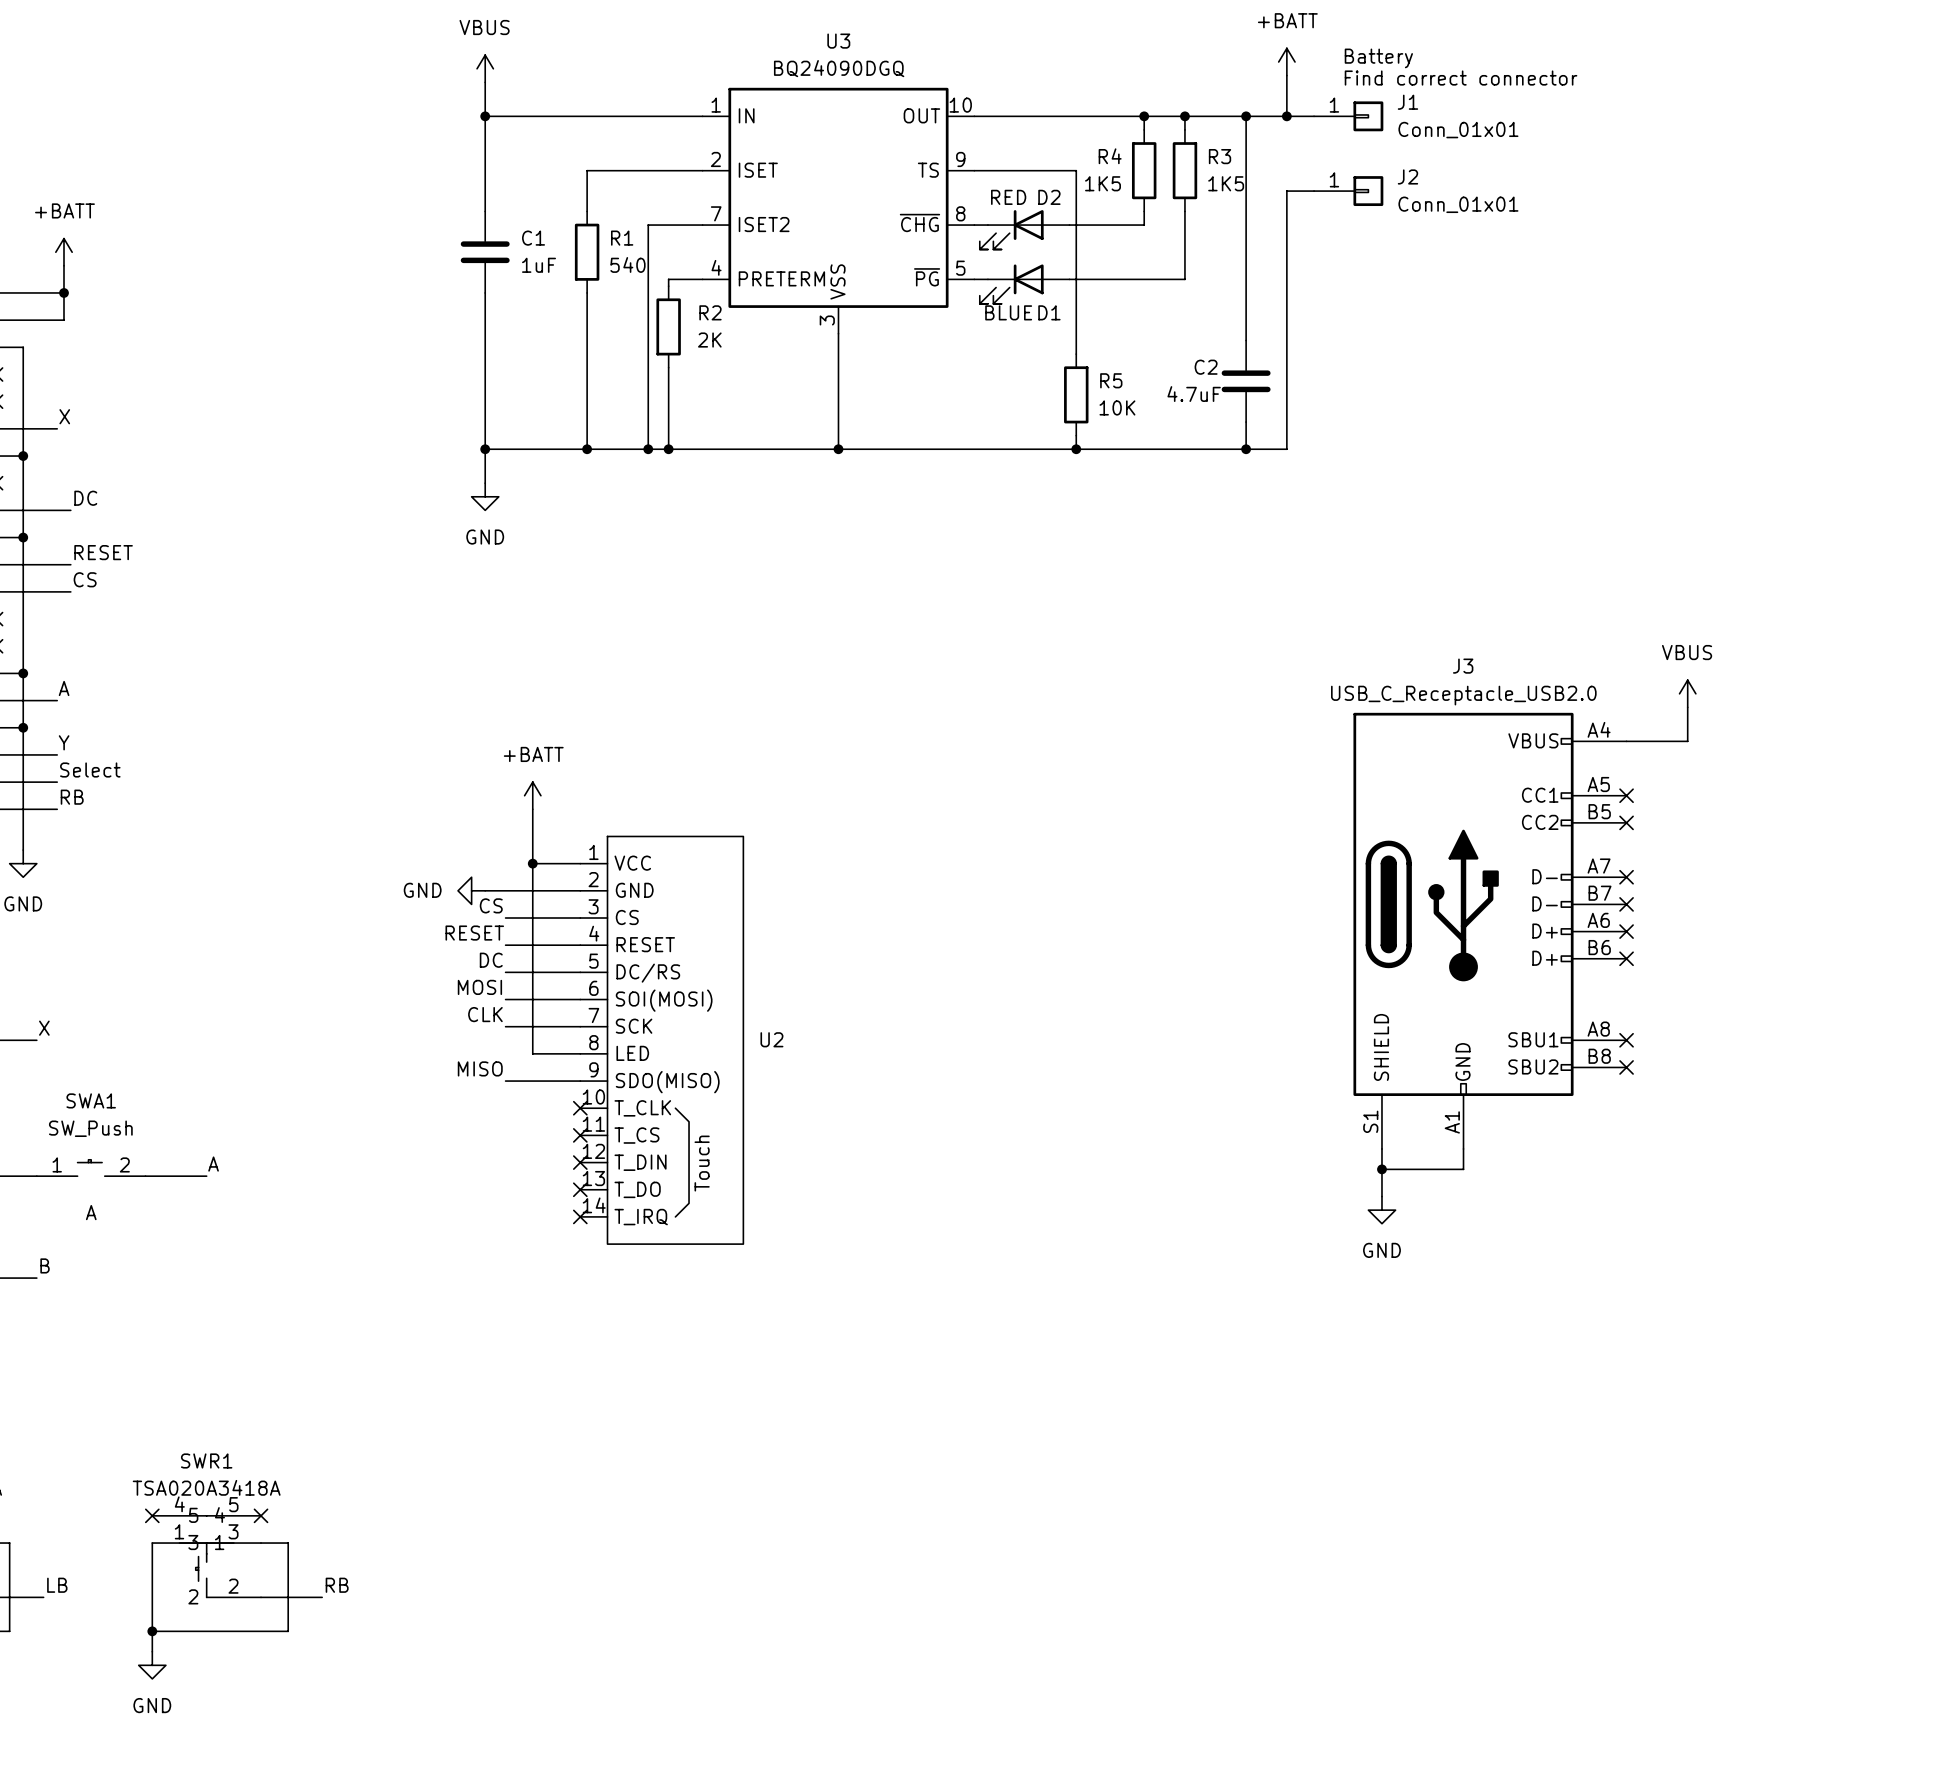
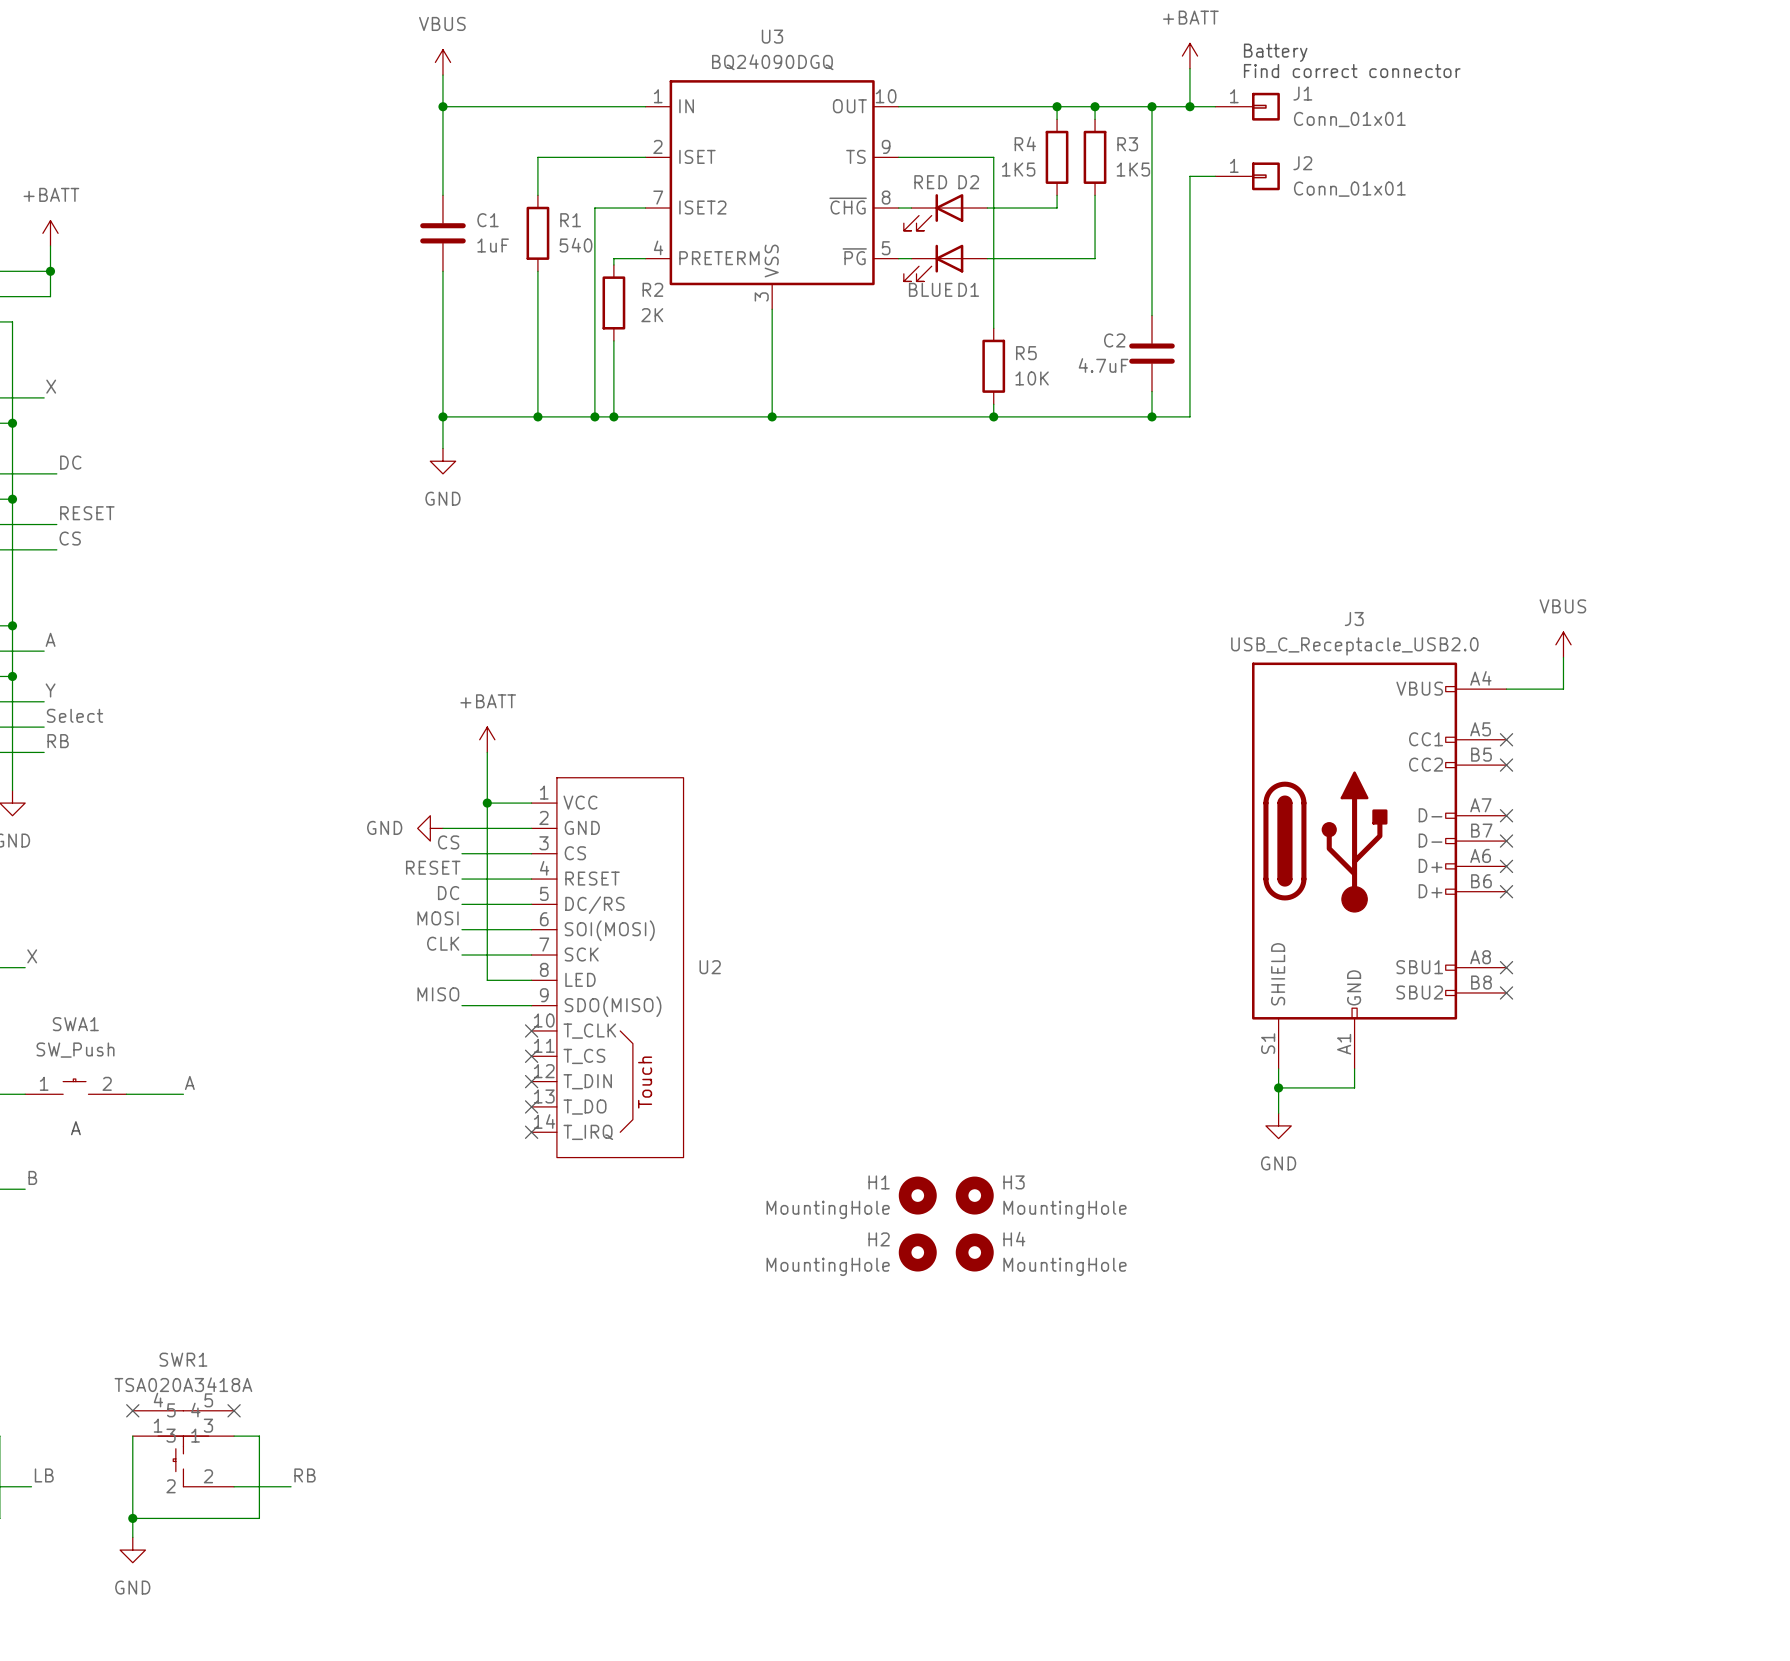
H1: none -> MountingHole (917, 1195)
H3: none -> MountingHole (974, 1195)
H2: none -> MountingHole (917, 1252)
H4: none -> MountingHole (974, 1252)

